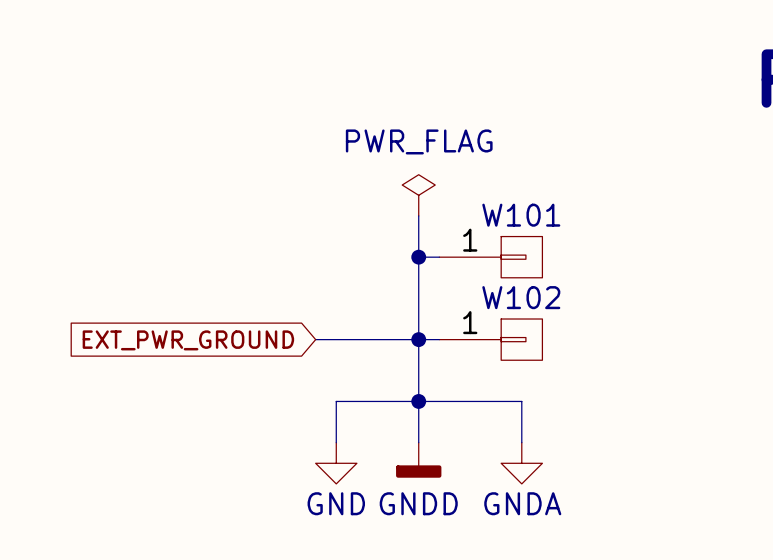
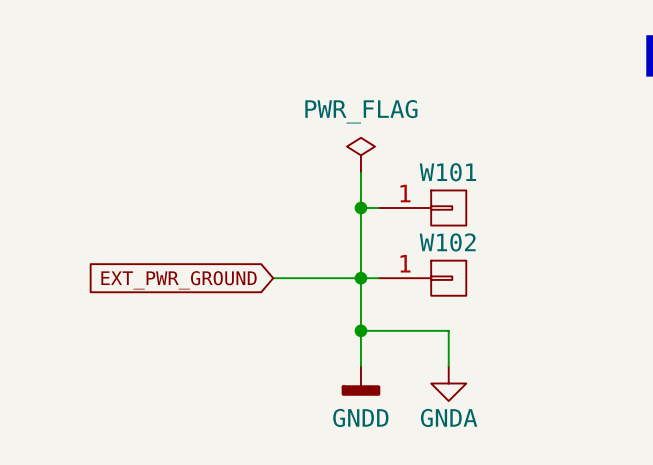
wire: (418, 401) (336, 401) (336, 442) -> none
power symbol: GND (336, 463) -> none

